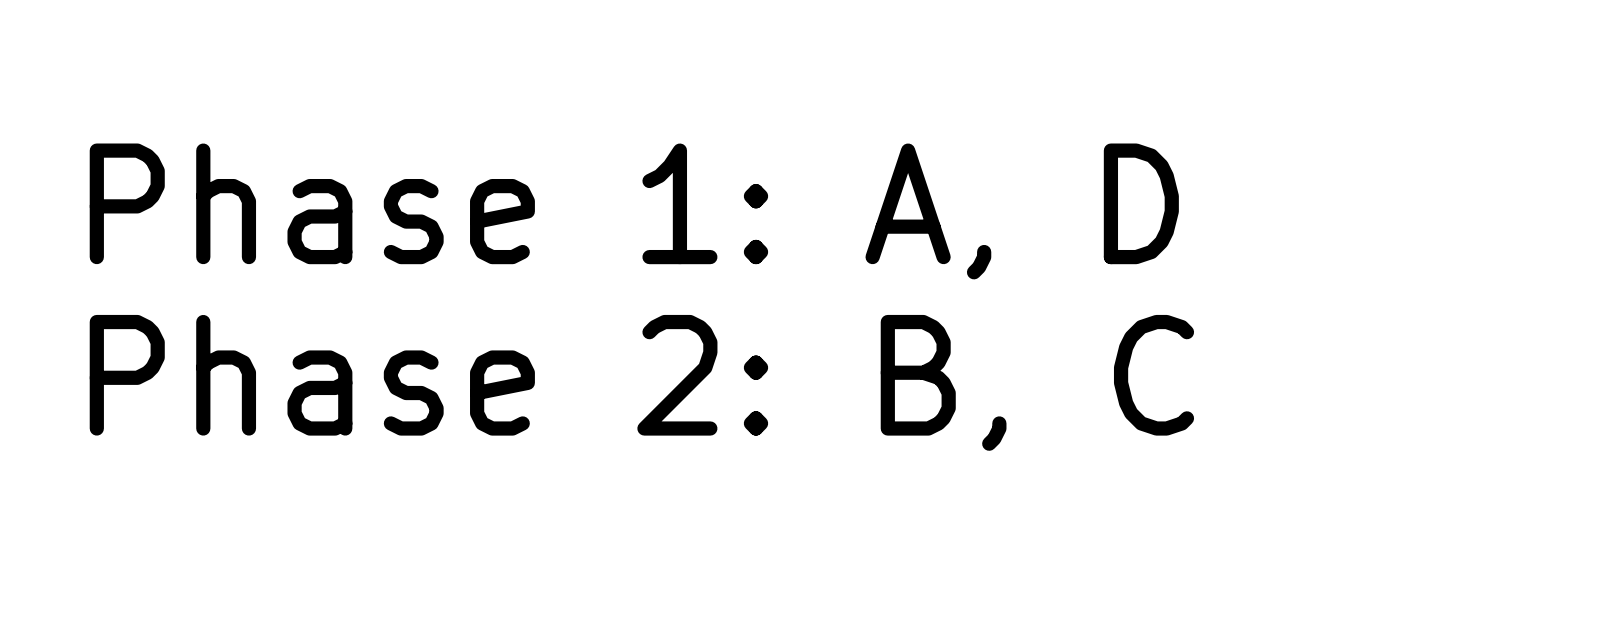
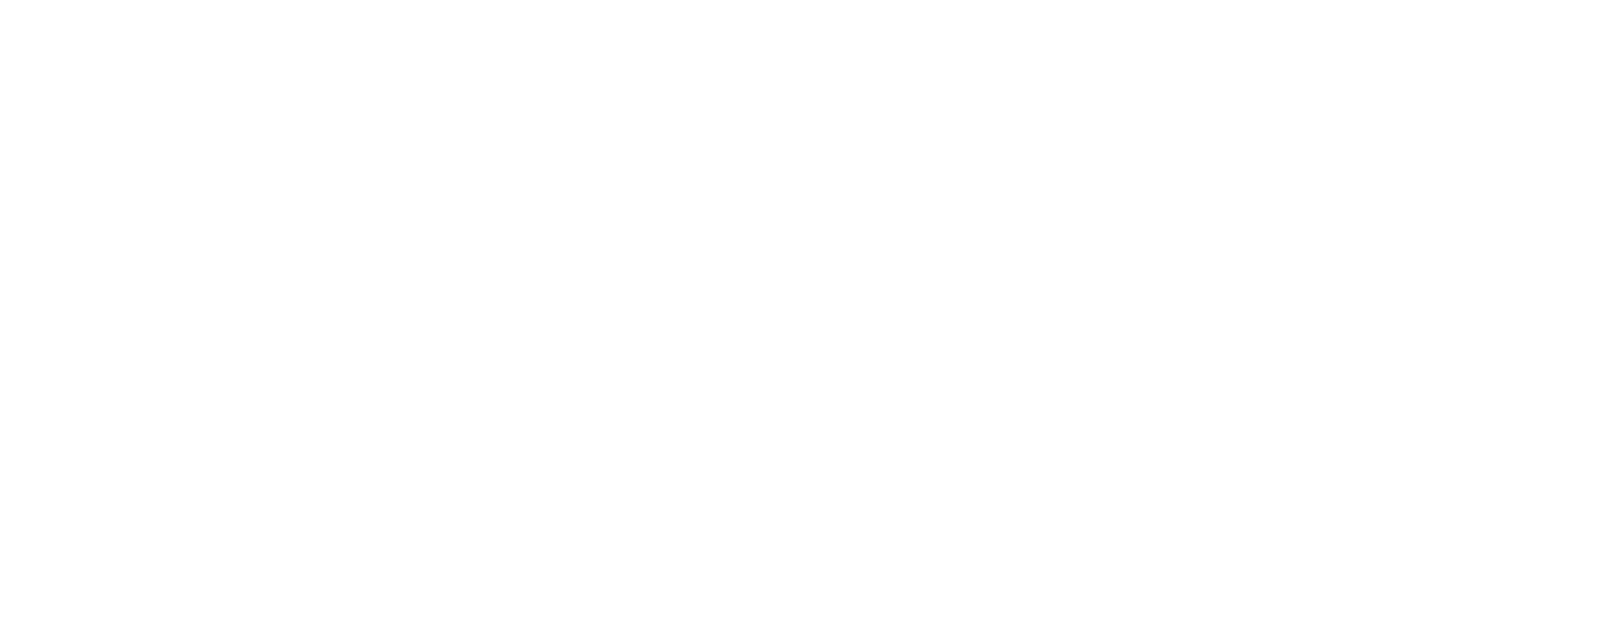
text: Phase 1: A, D (634, 211) -> none
text: Phase 2: B, C (641, 382) -> none

